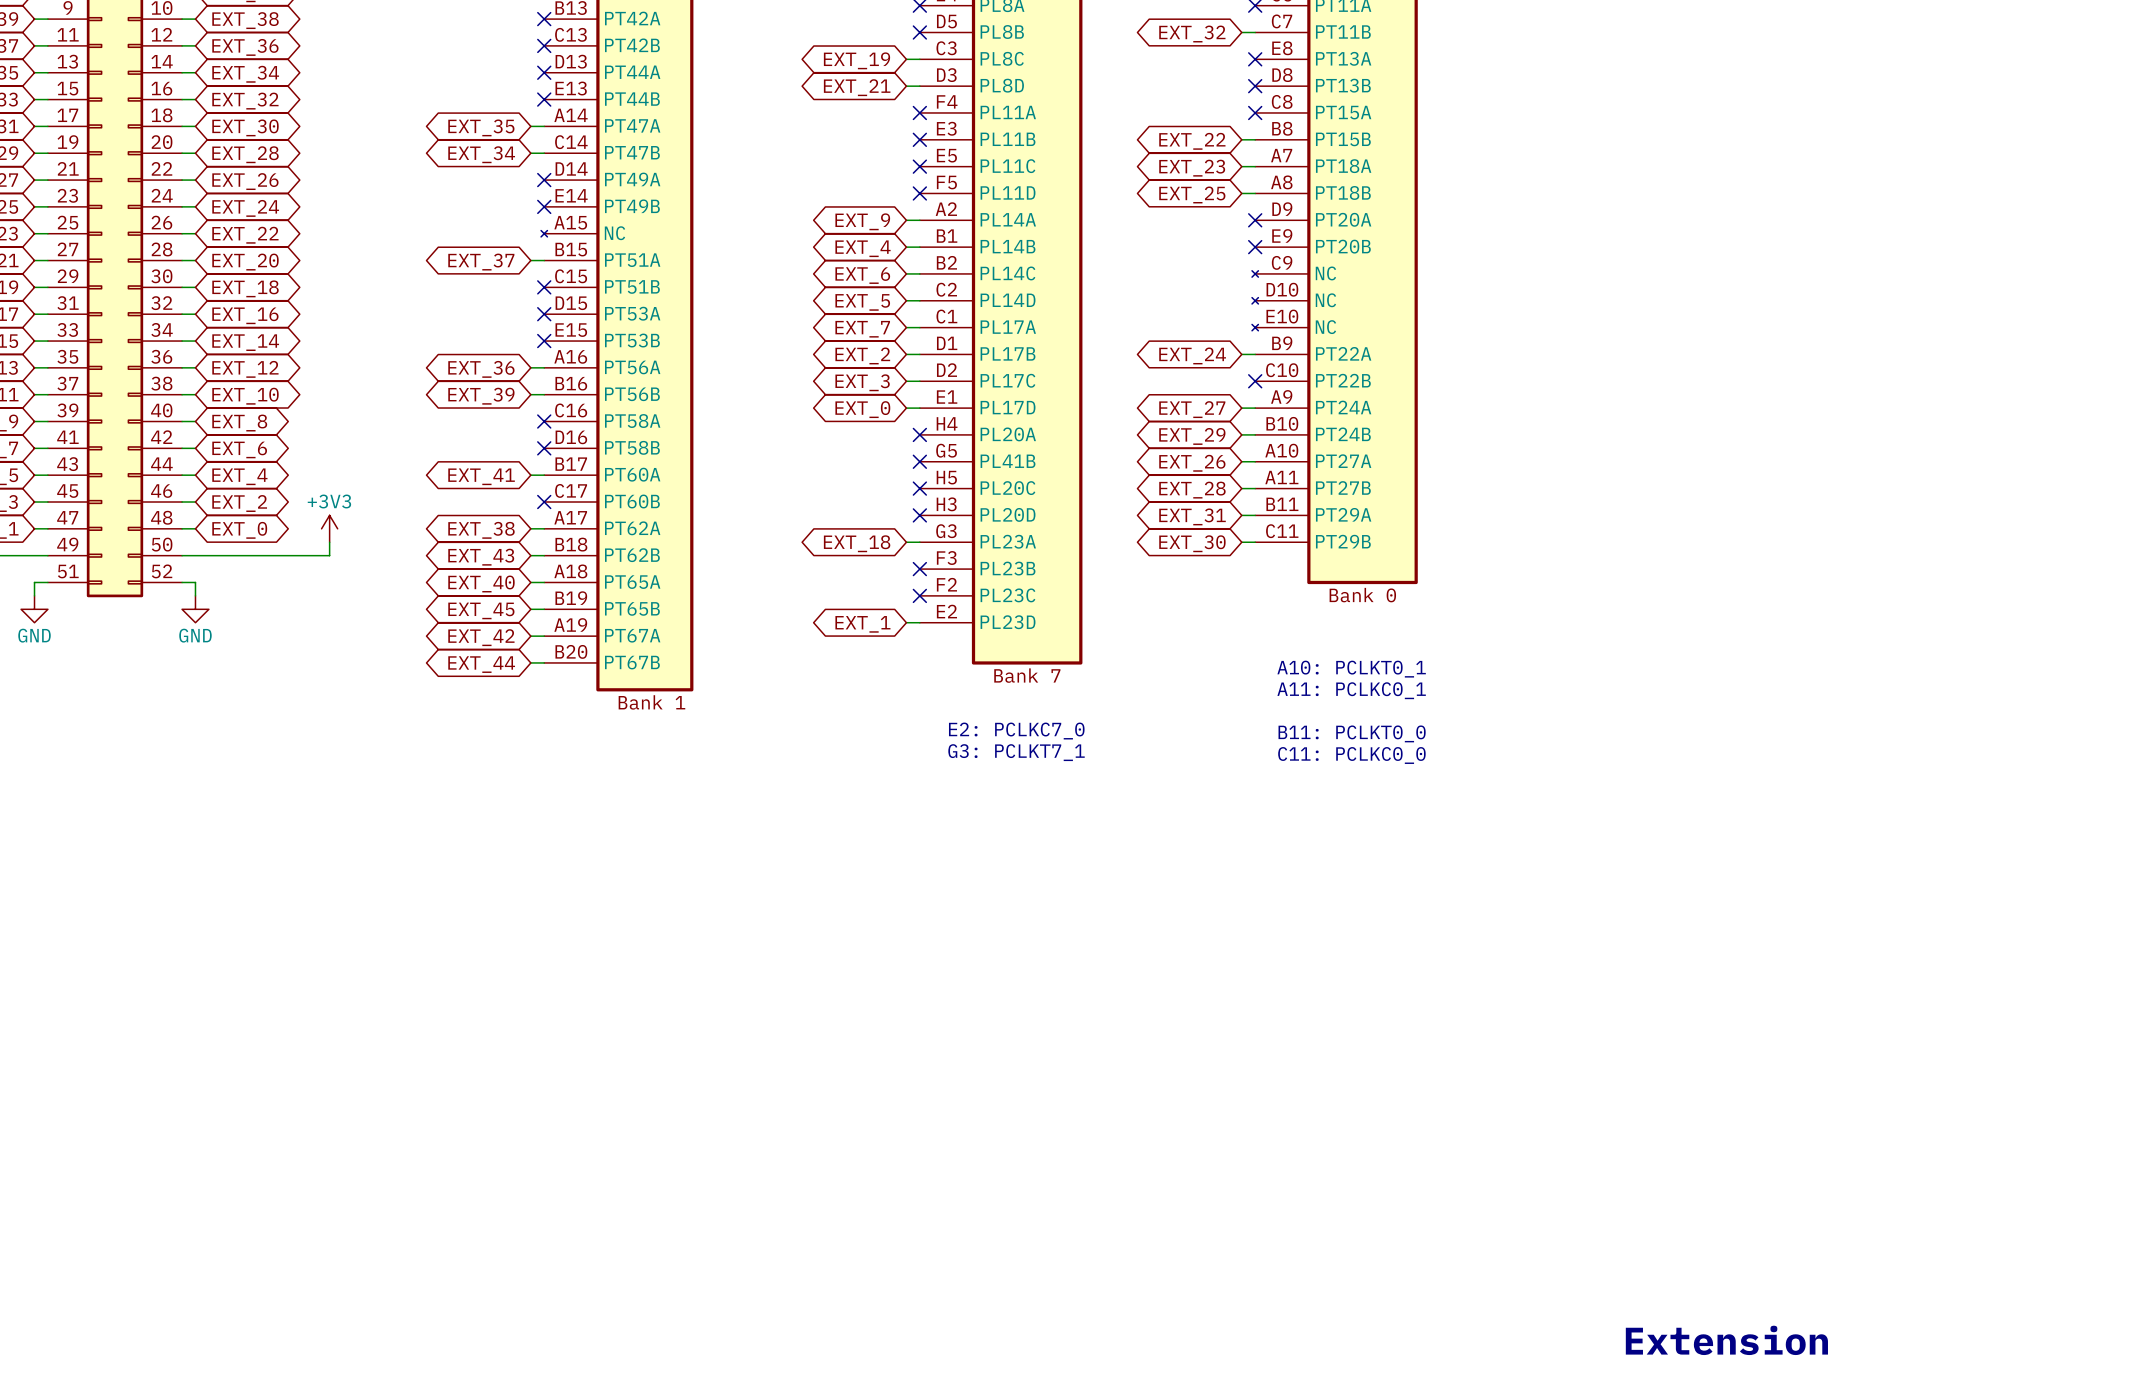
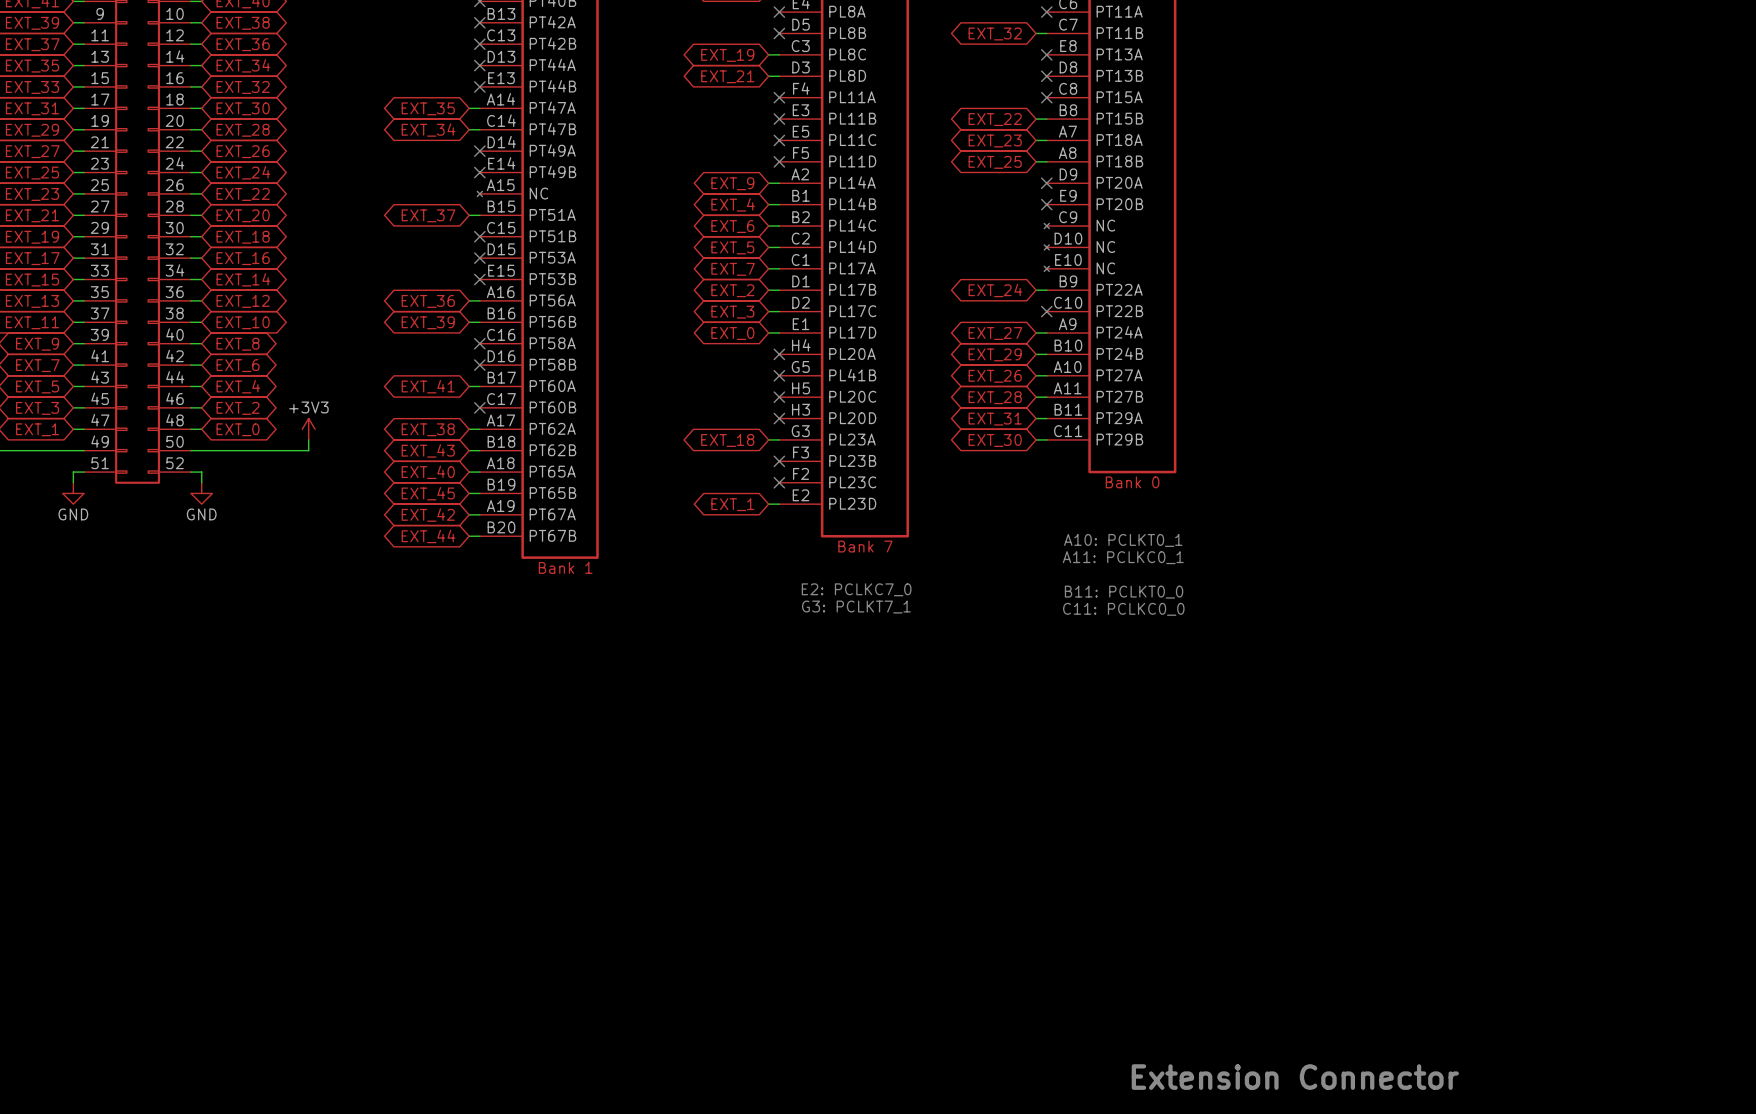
text: none -> Extension Connector (1295, 1077)
text: Extension (1726, 1340) -> none

